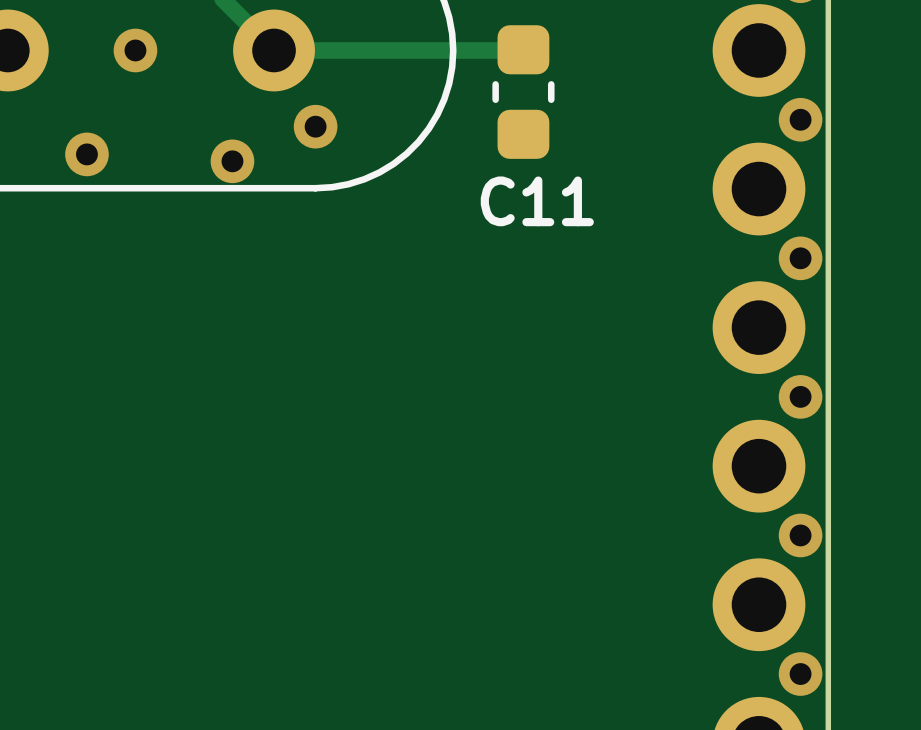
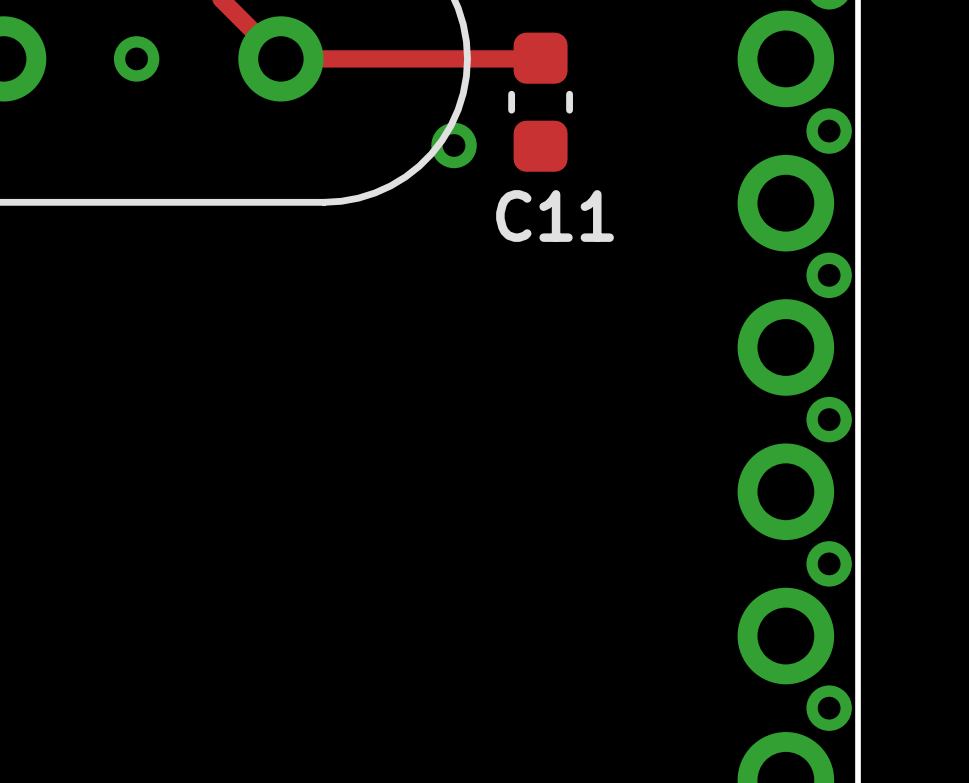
via: (315, 126) -> none
via: none -> (454, 145)
via: (86, 154) -> none
via: (232, 161) -> none

